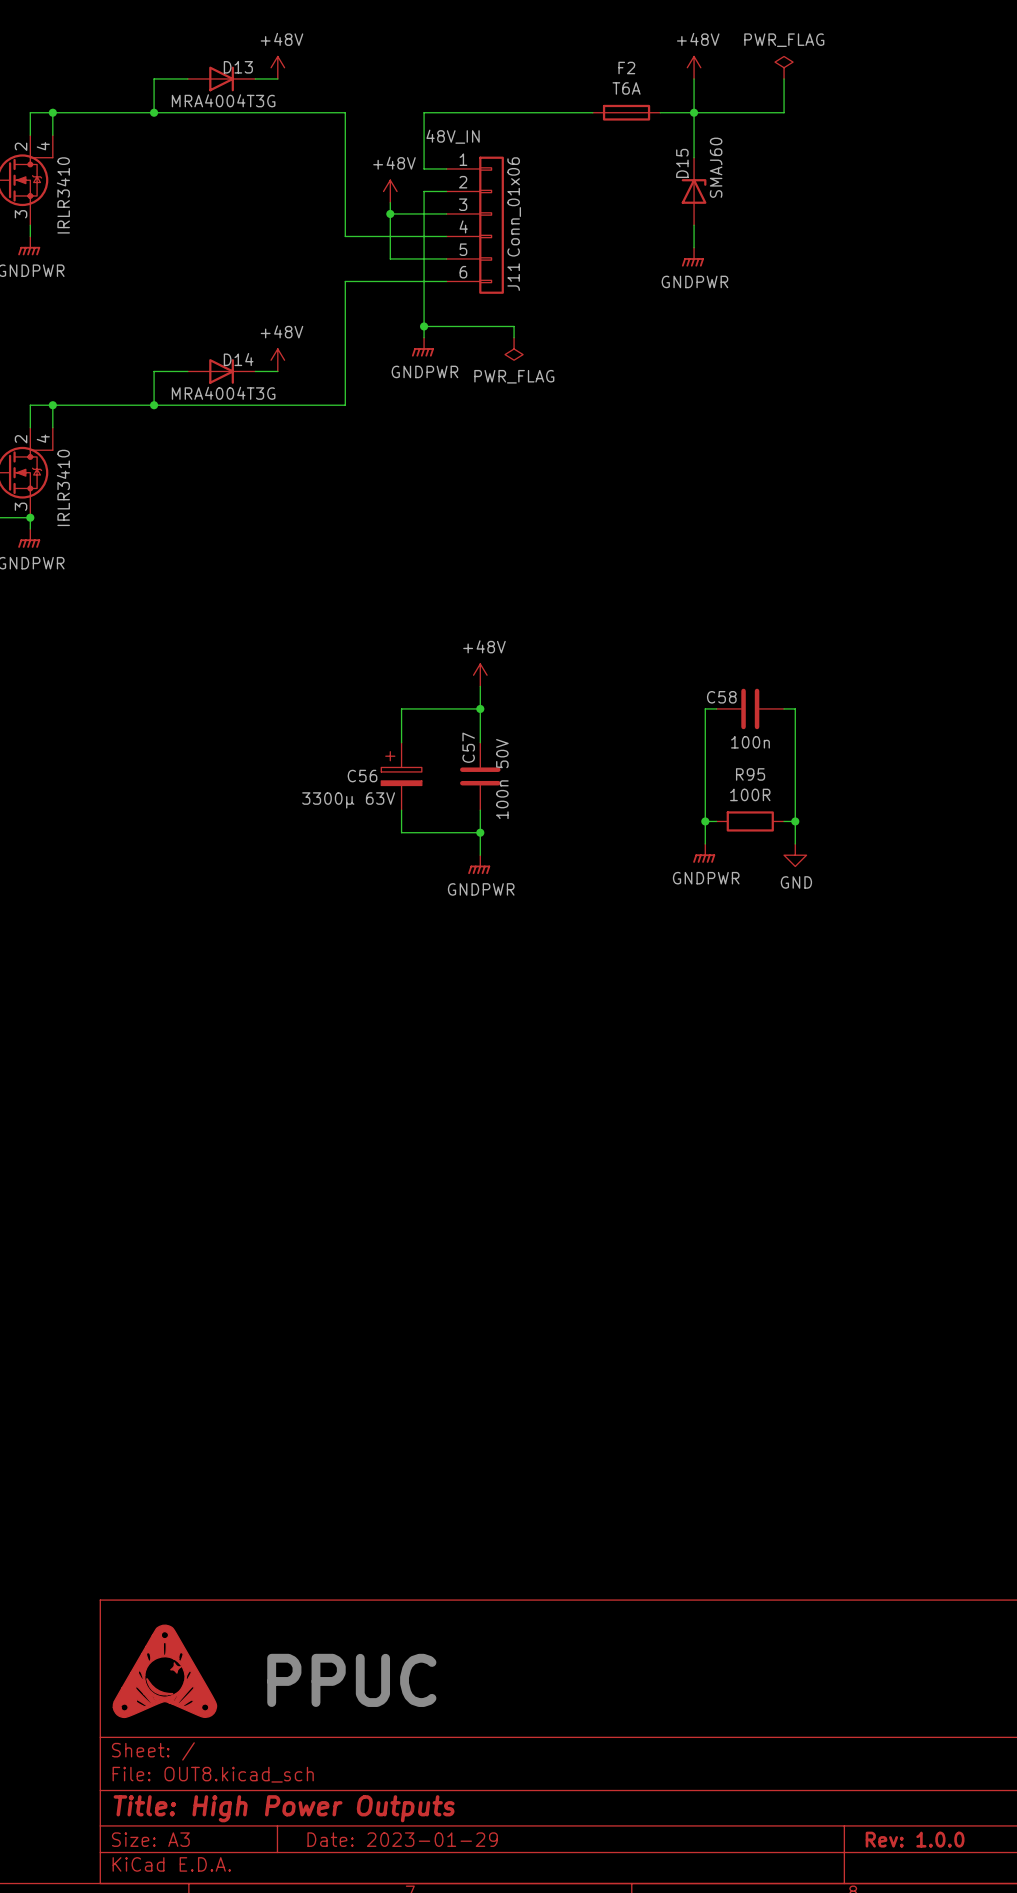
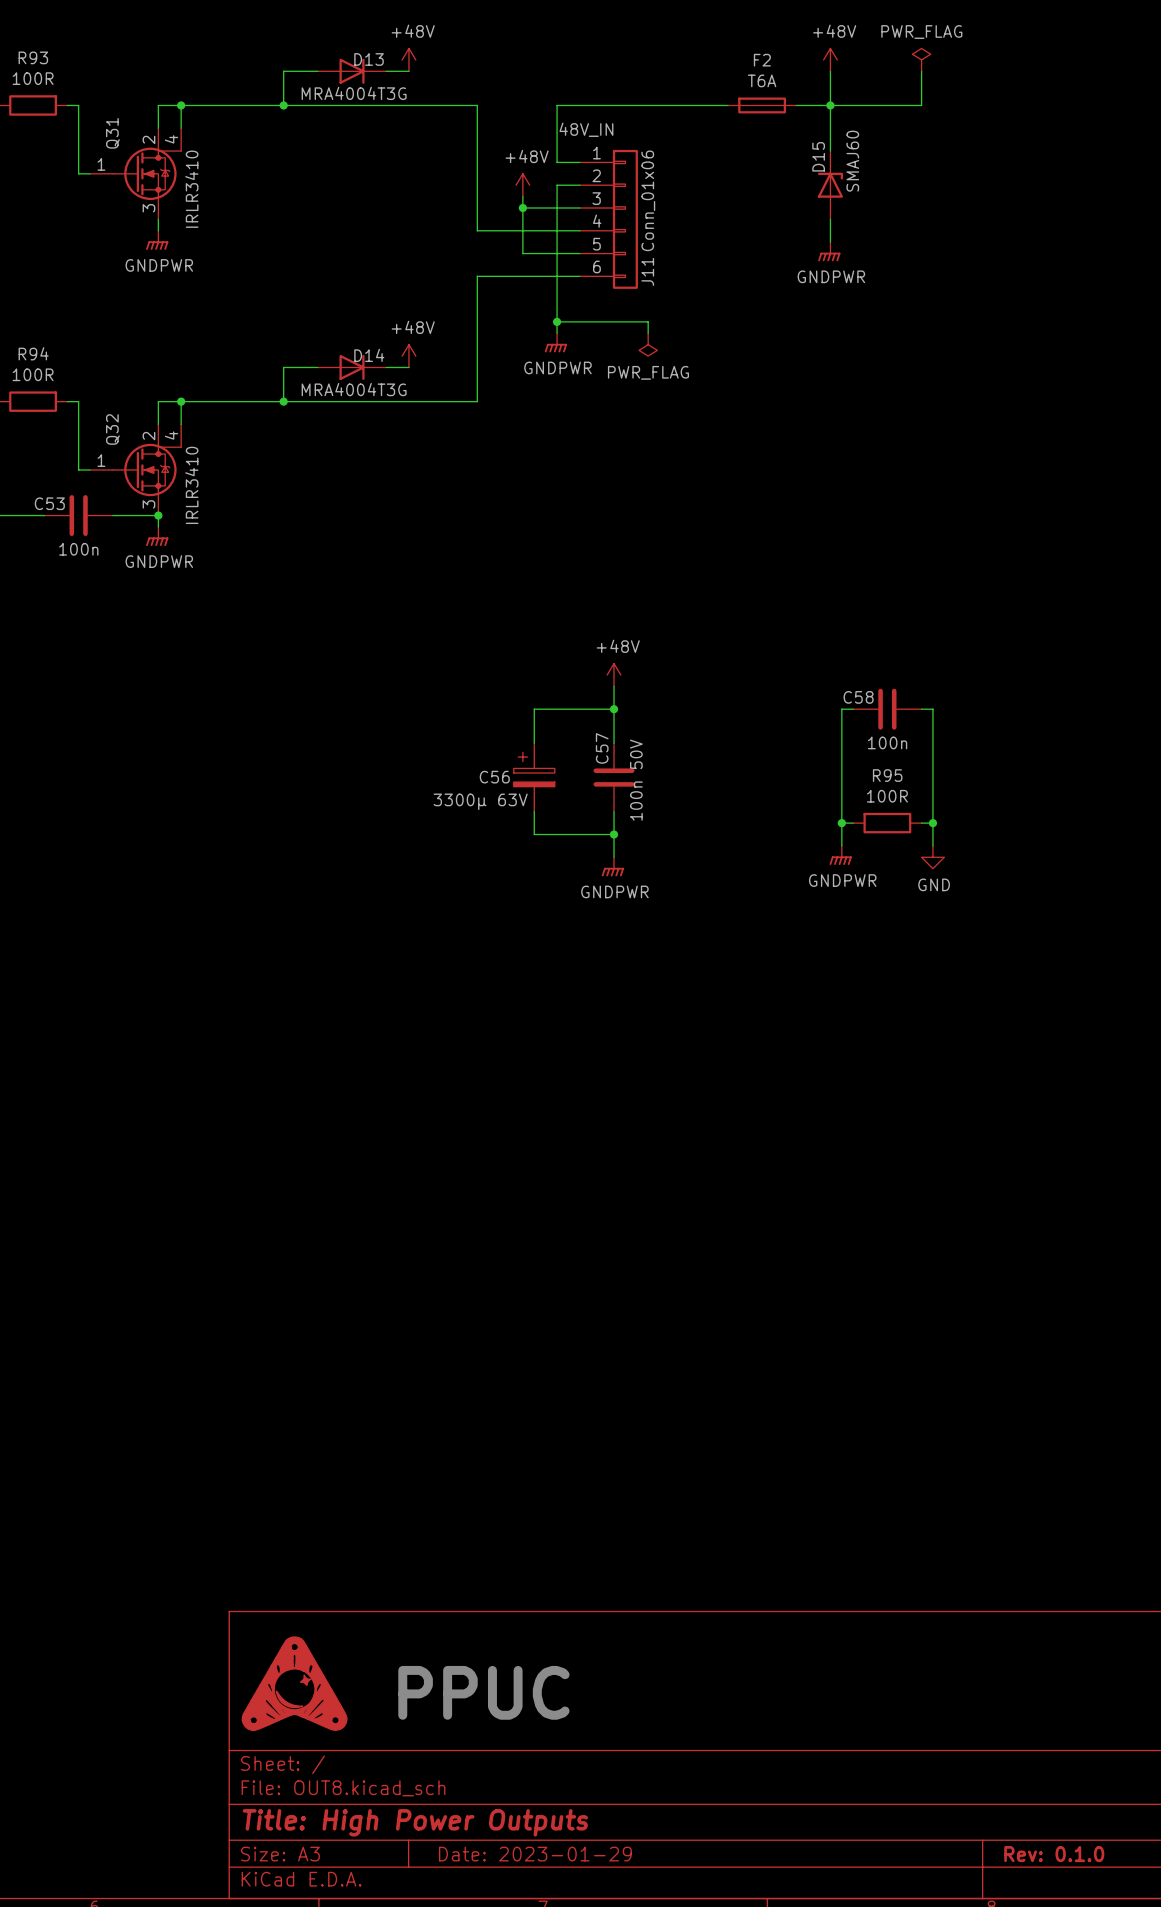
title block: Rev: 1.0.0 (915, 1839) -> Rev: 0.1.0 (1054, 1854)

